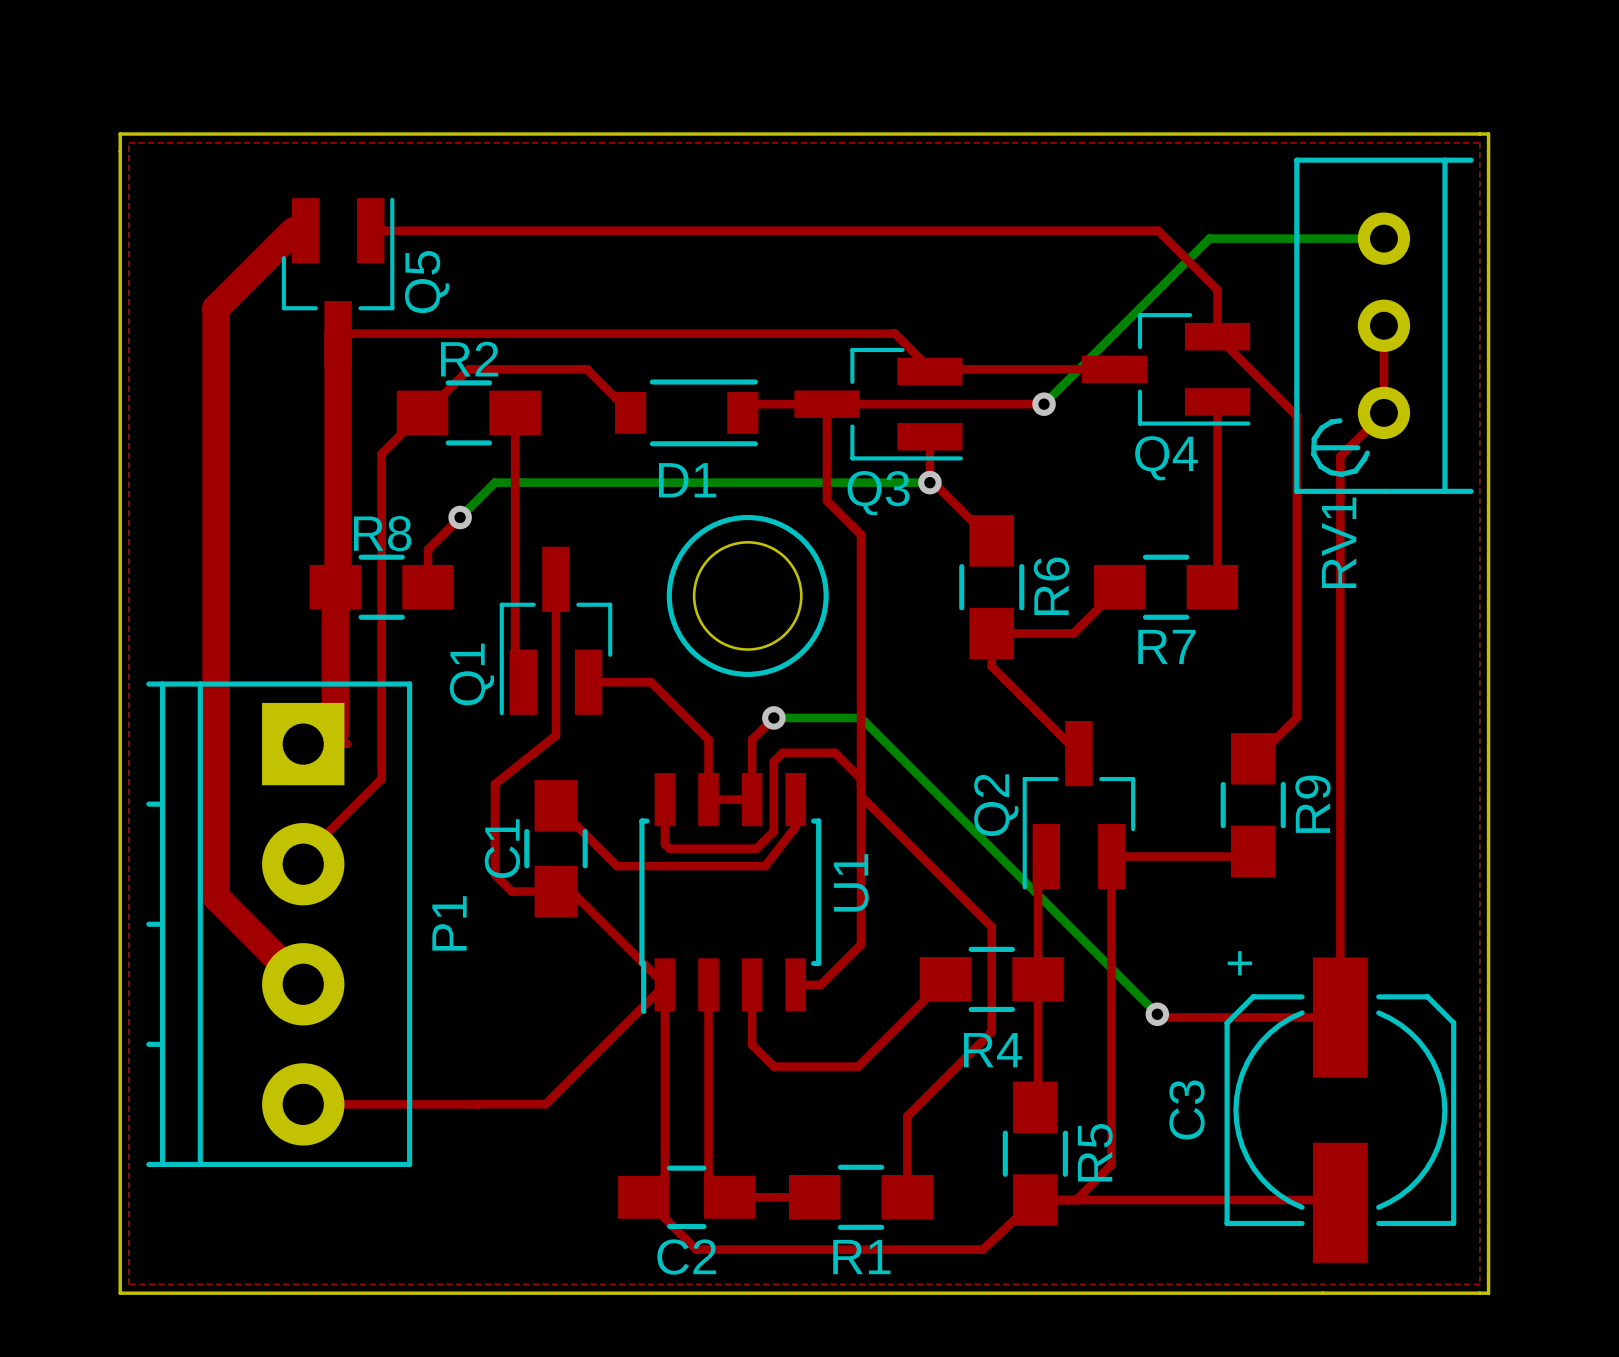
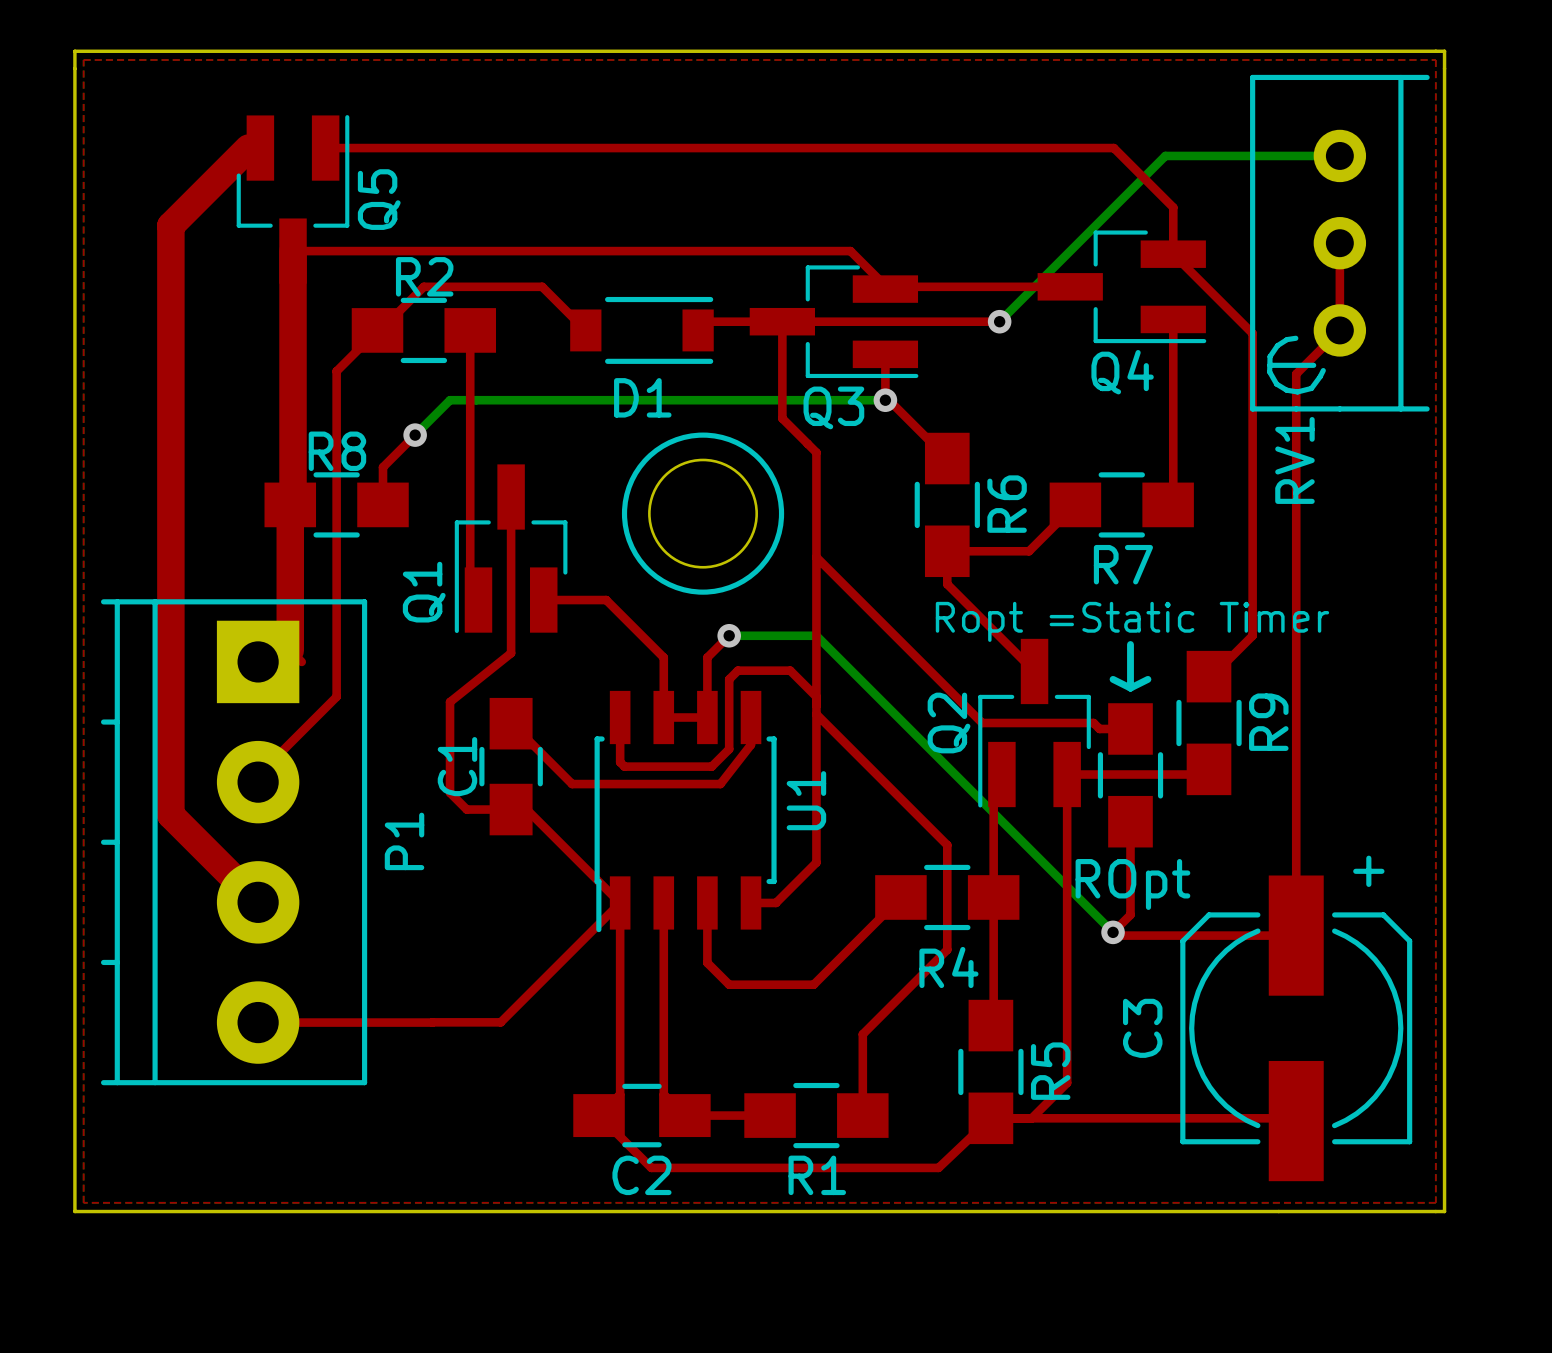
top track: none -> (816, 557) (982, 723) (1093, 723) (1099, 728) (1130, 728)
text: none -> Ropt =Static Timer (1132, 621)
line: none -> (1130, 644) (1130, 688)
line: none -> (1113, 679) (1130, 688)
line: none -> (1147, 679) (1130, 688)
ROpt: none -> (1130, 775)
top track: none -> (1130, 821) (1130, 914) (1113, 932)
C3 text position: + (1239, 963) -> + (1368, 871)

